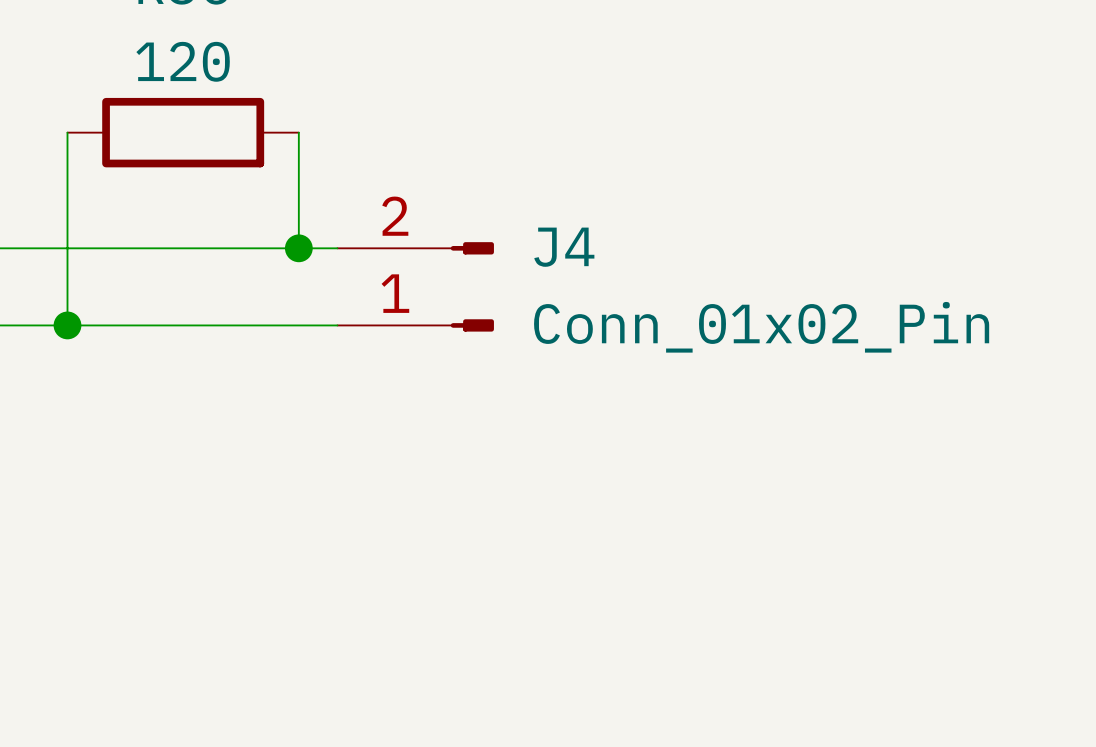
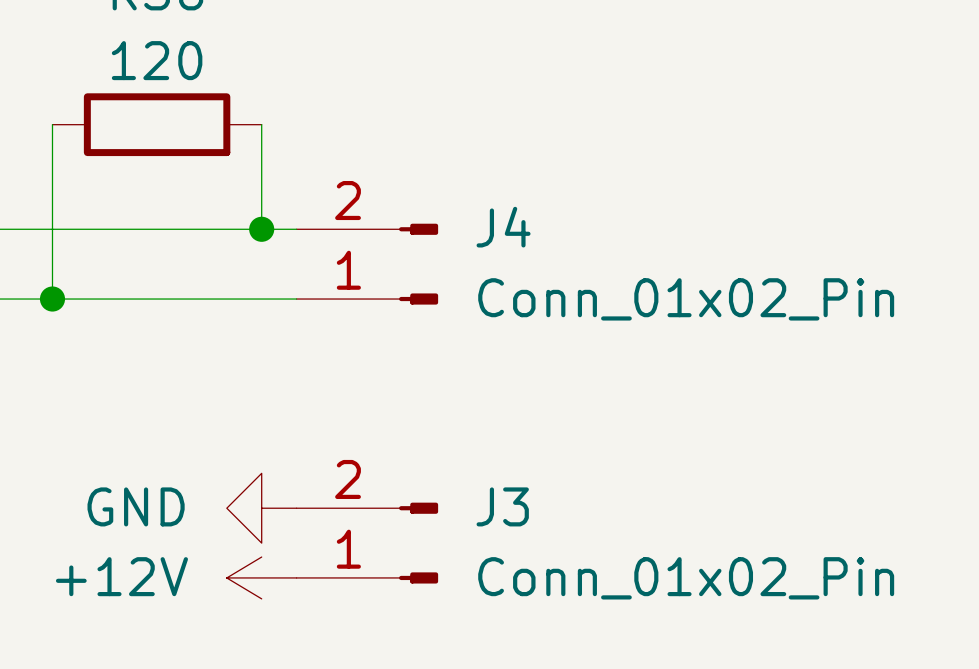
power symbol: none -> GND (261, 508)
J3: none -> Conn_01x02_Pin (367, 543)
power symbol: none -> +12V (261, 577)

